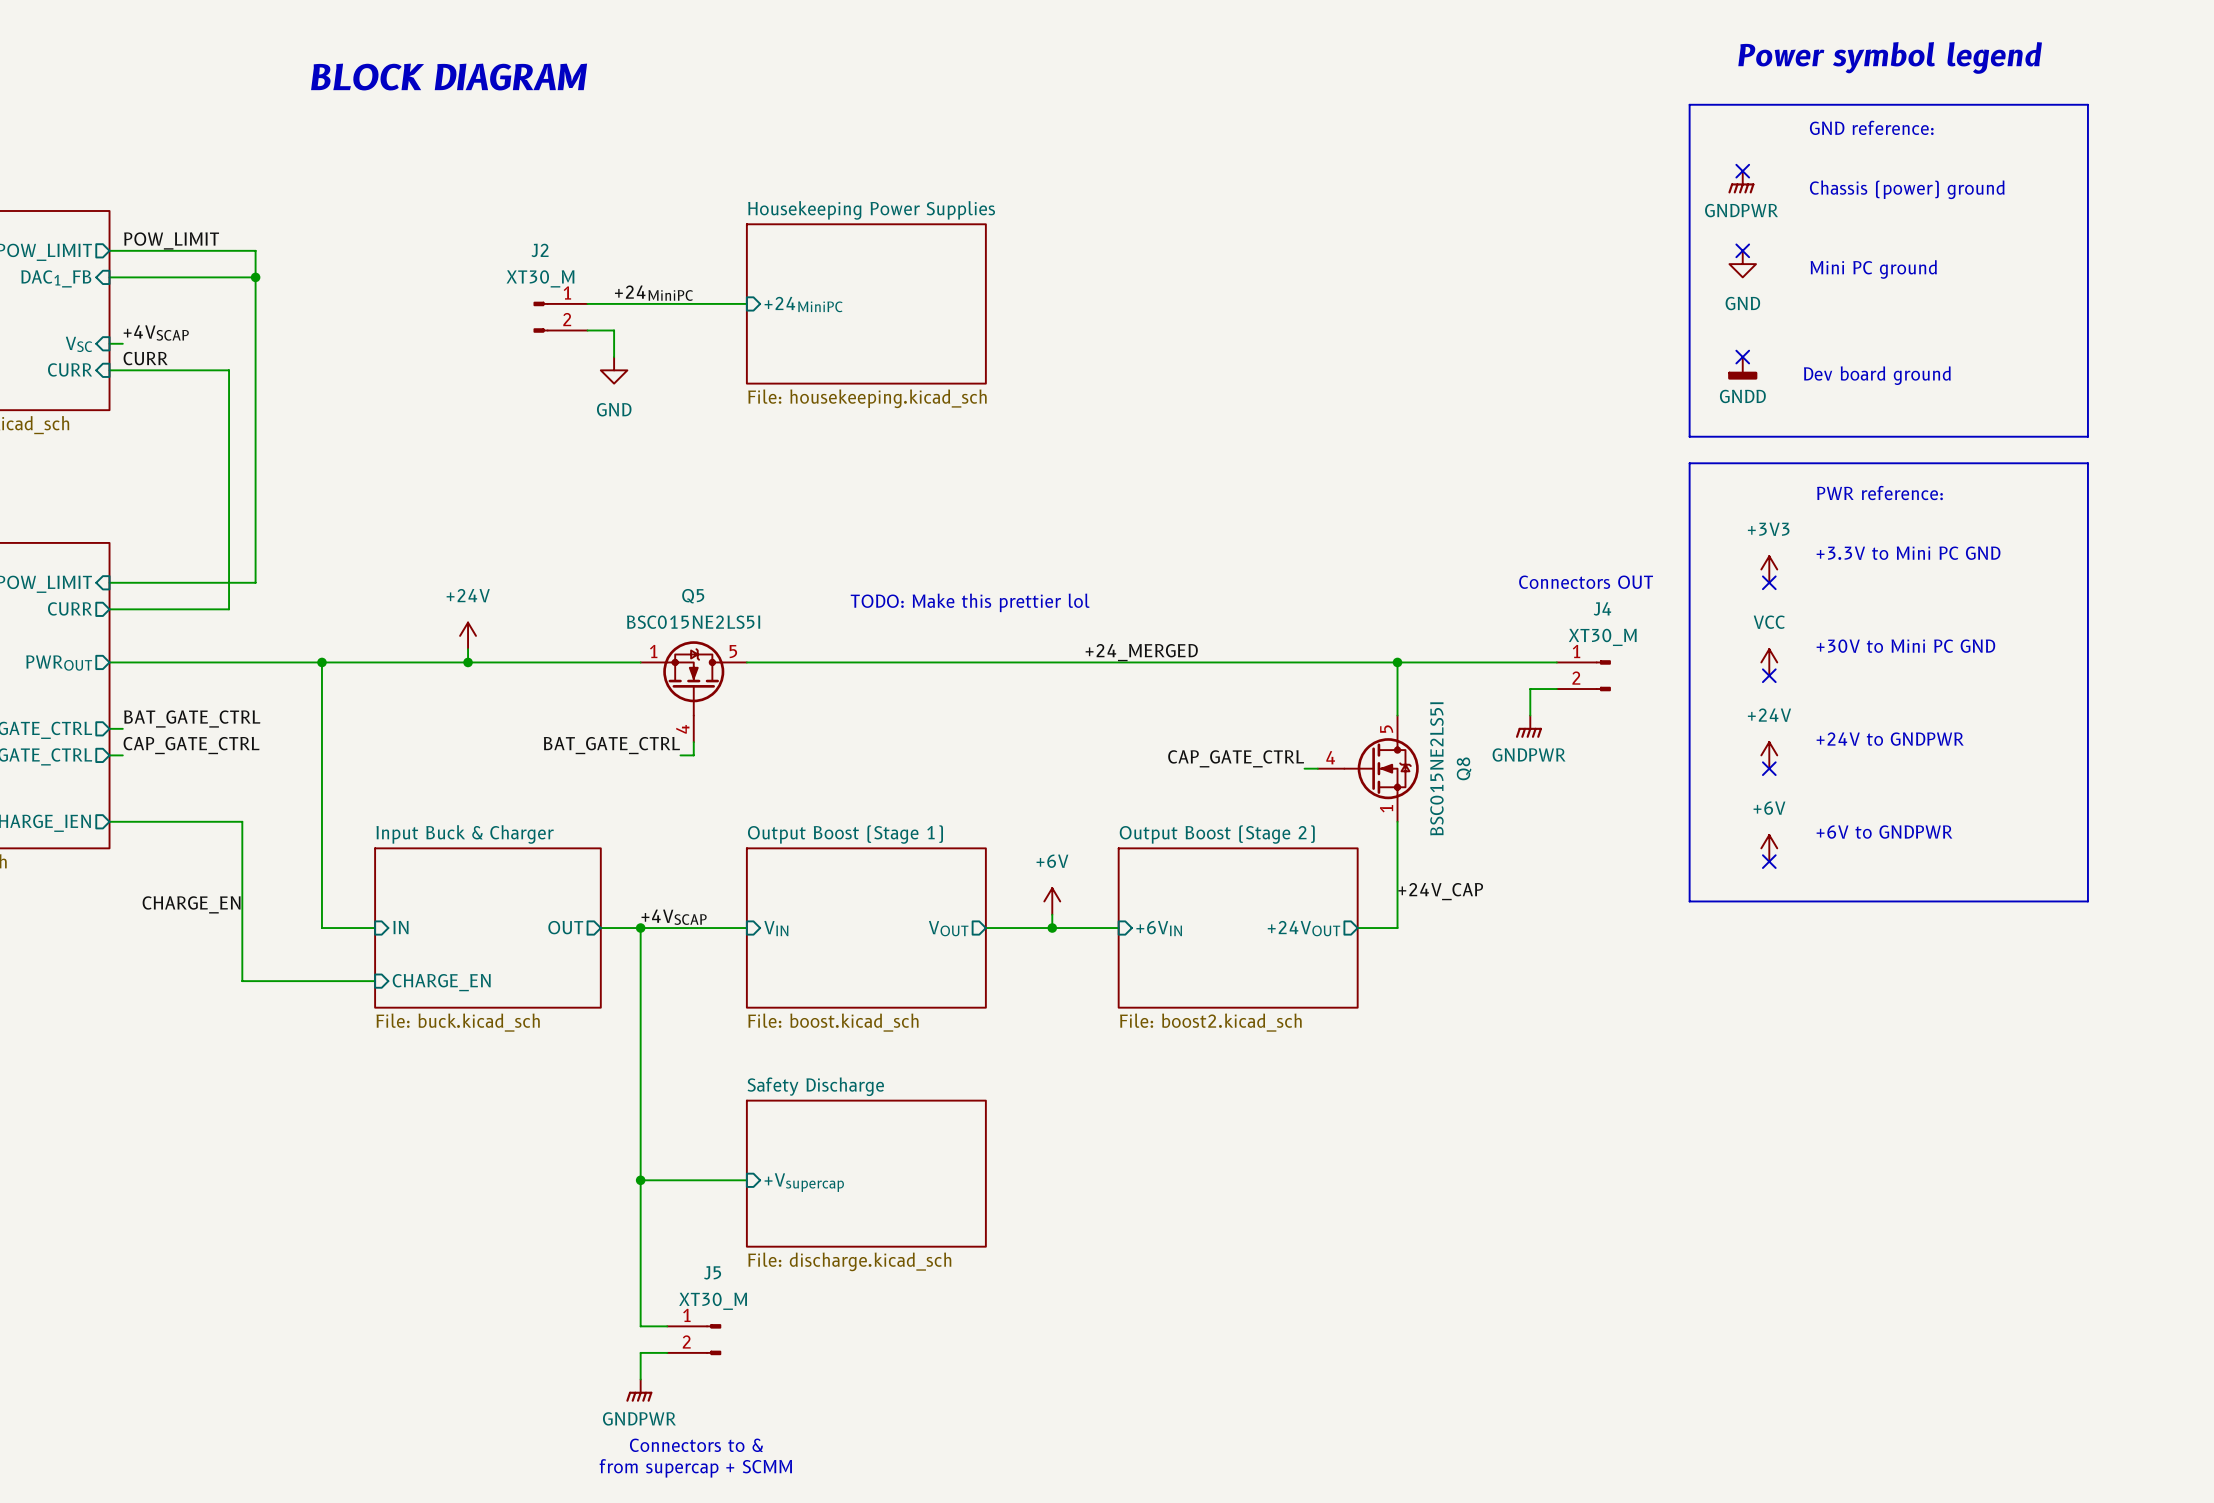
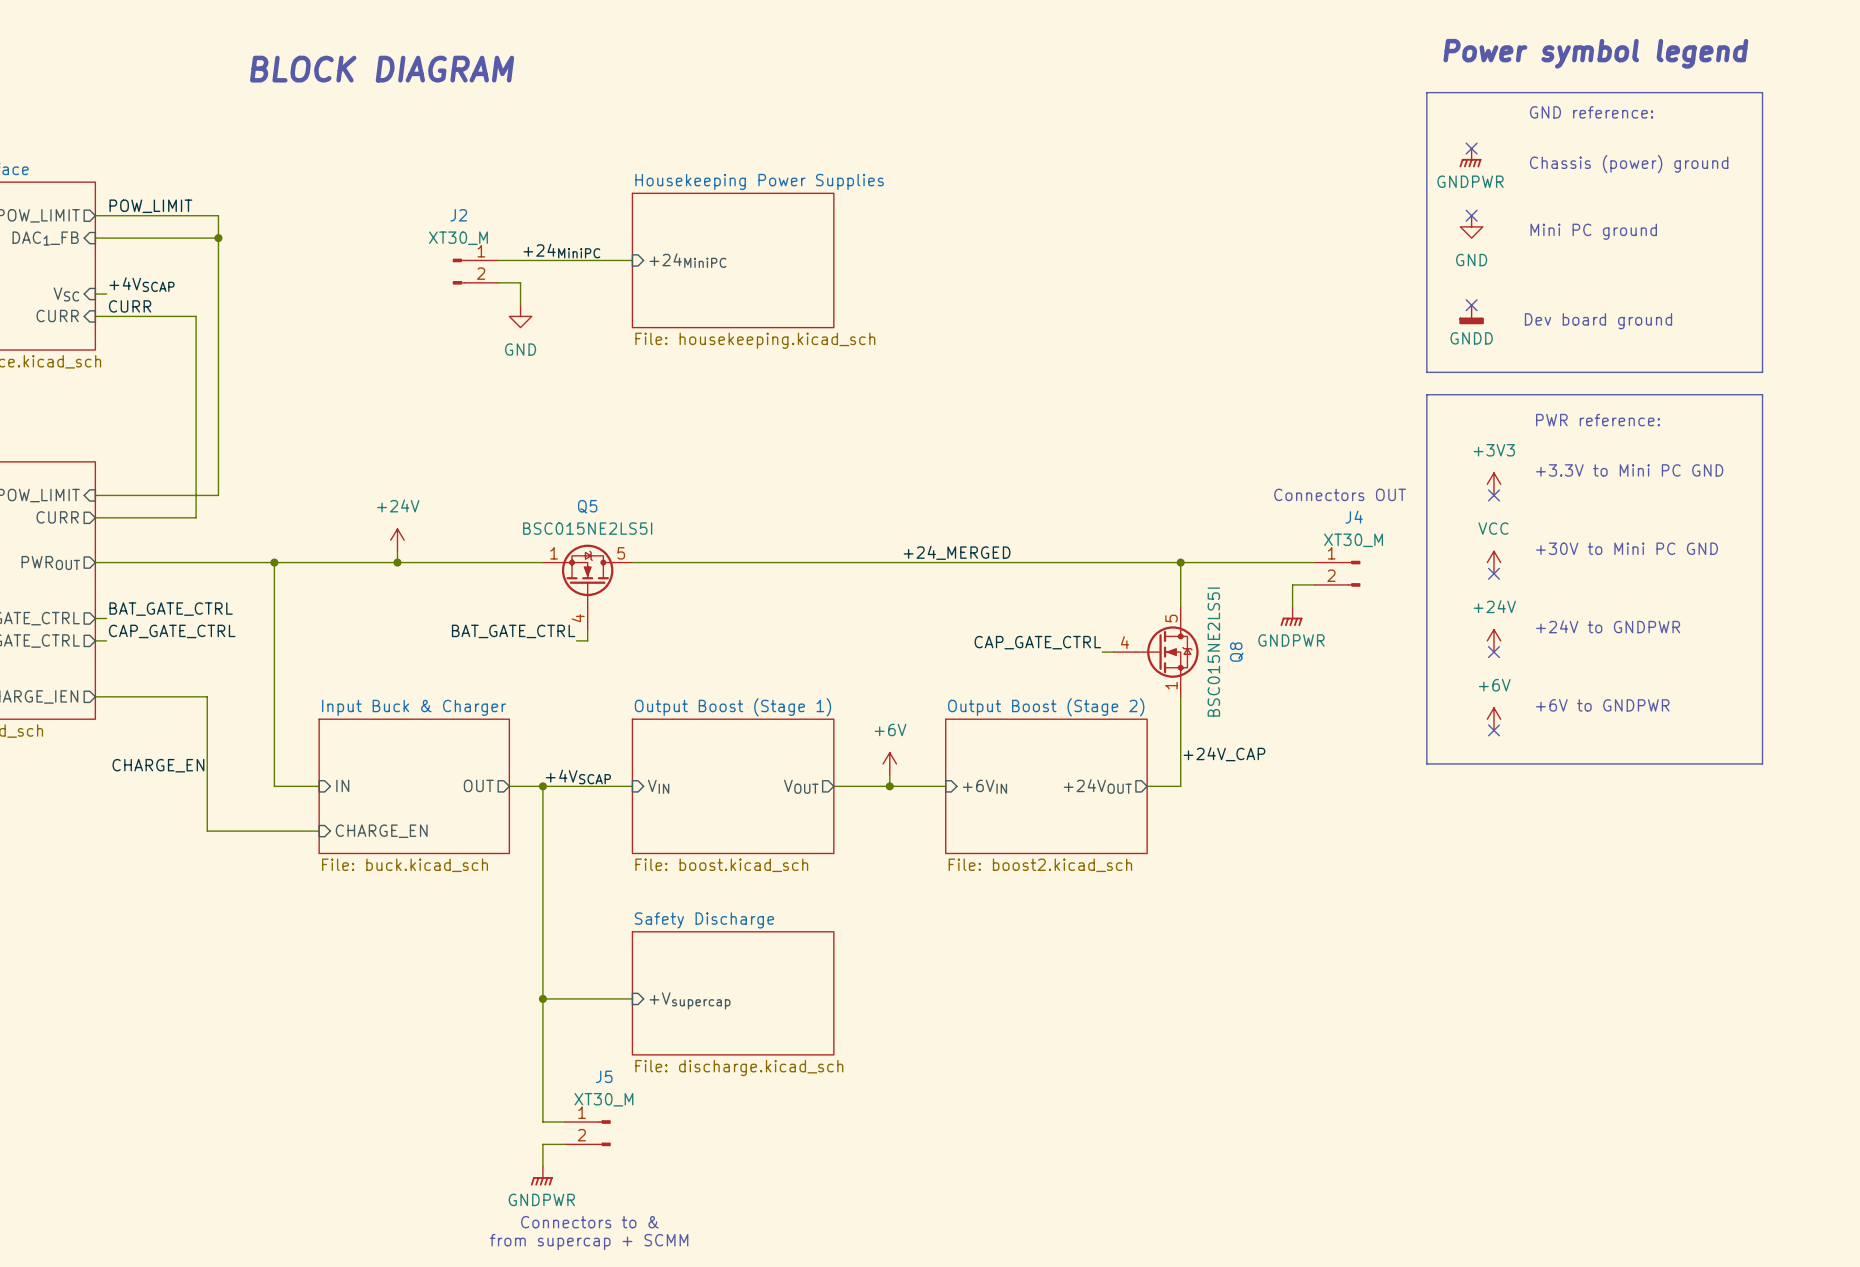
text: TODO: Make this prettier lol (970, 602) -> none

